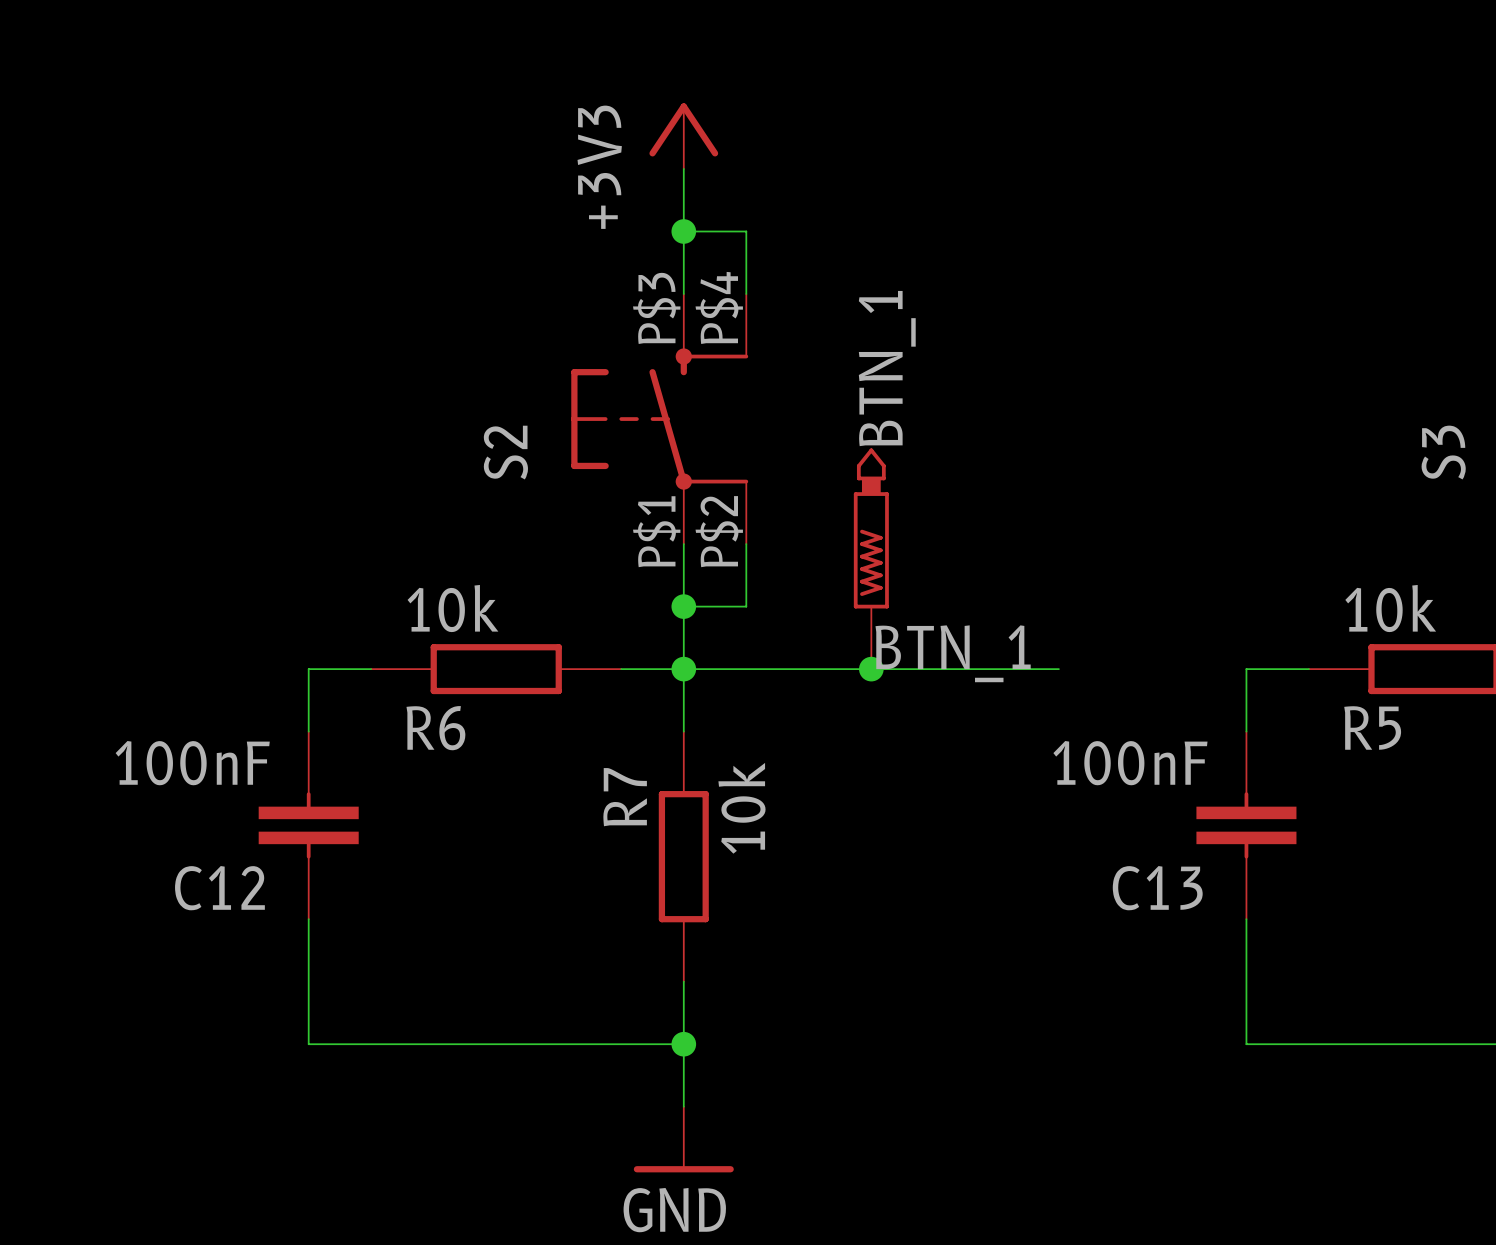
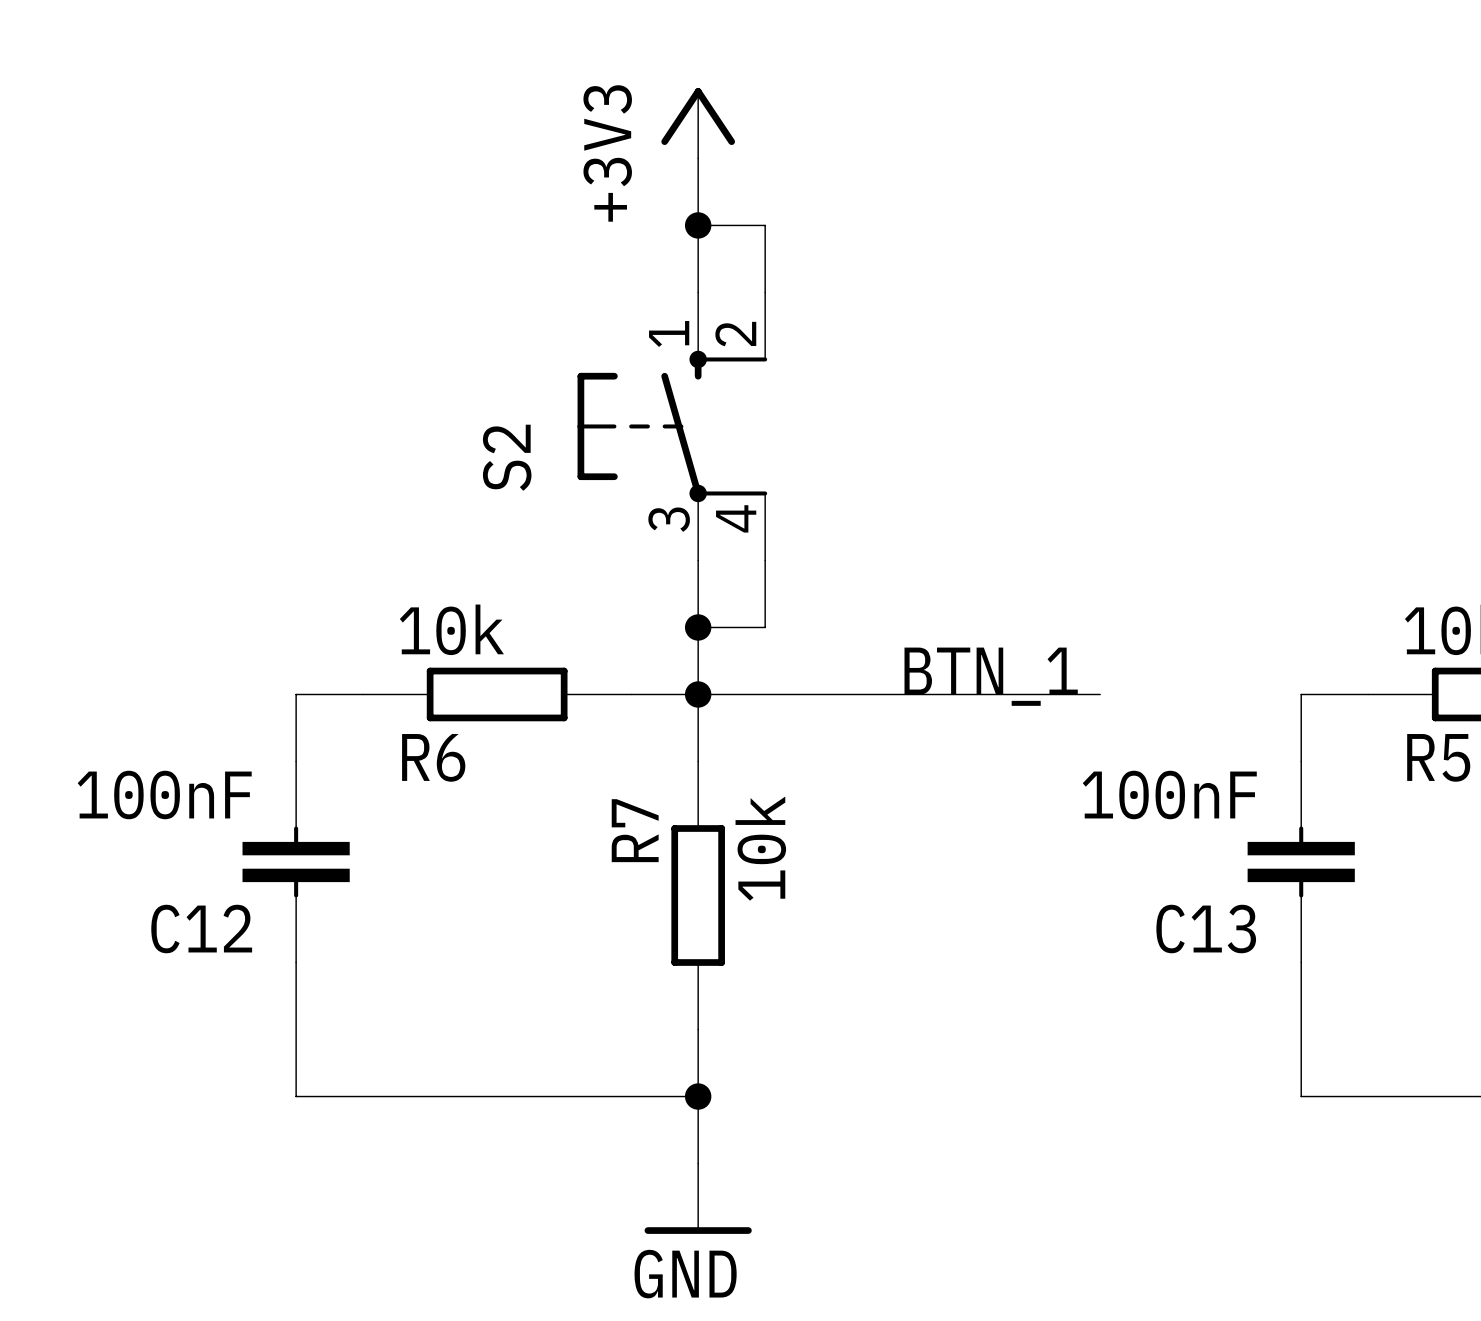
S2 pin number: P$4 (719, 307) -> 2 (735, 334)
S2 pin number: P$3 (656, 308) -> 1 (669, 333)
S2 pin number: P$1 (656, 531) -> 3 (669, 519)
S2 pin number: P$2 (719, 531) -> 4 (736, 518)
BTN_1: (871, 558) -> none
junction: (871, 669) -> none

